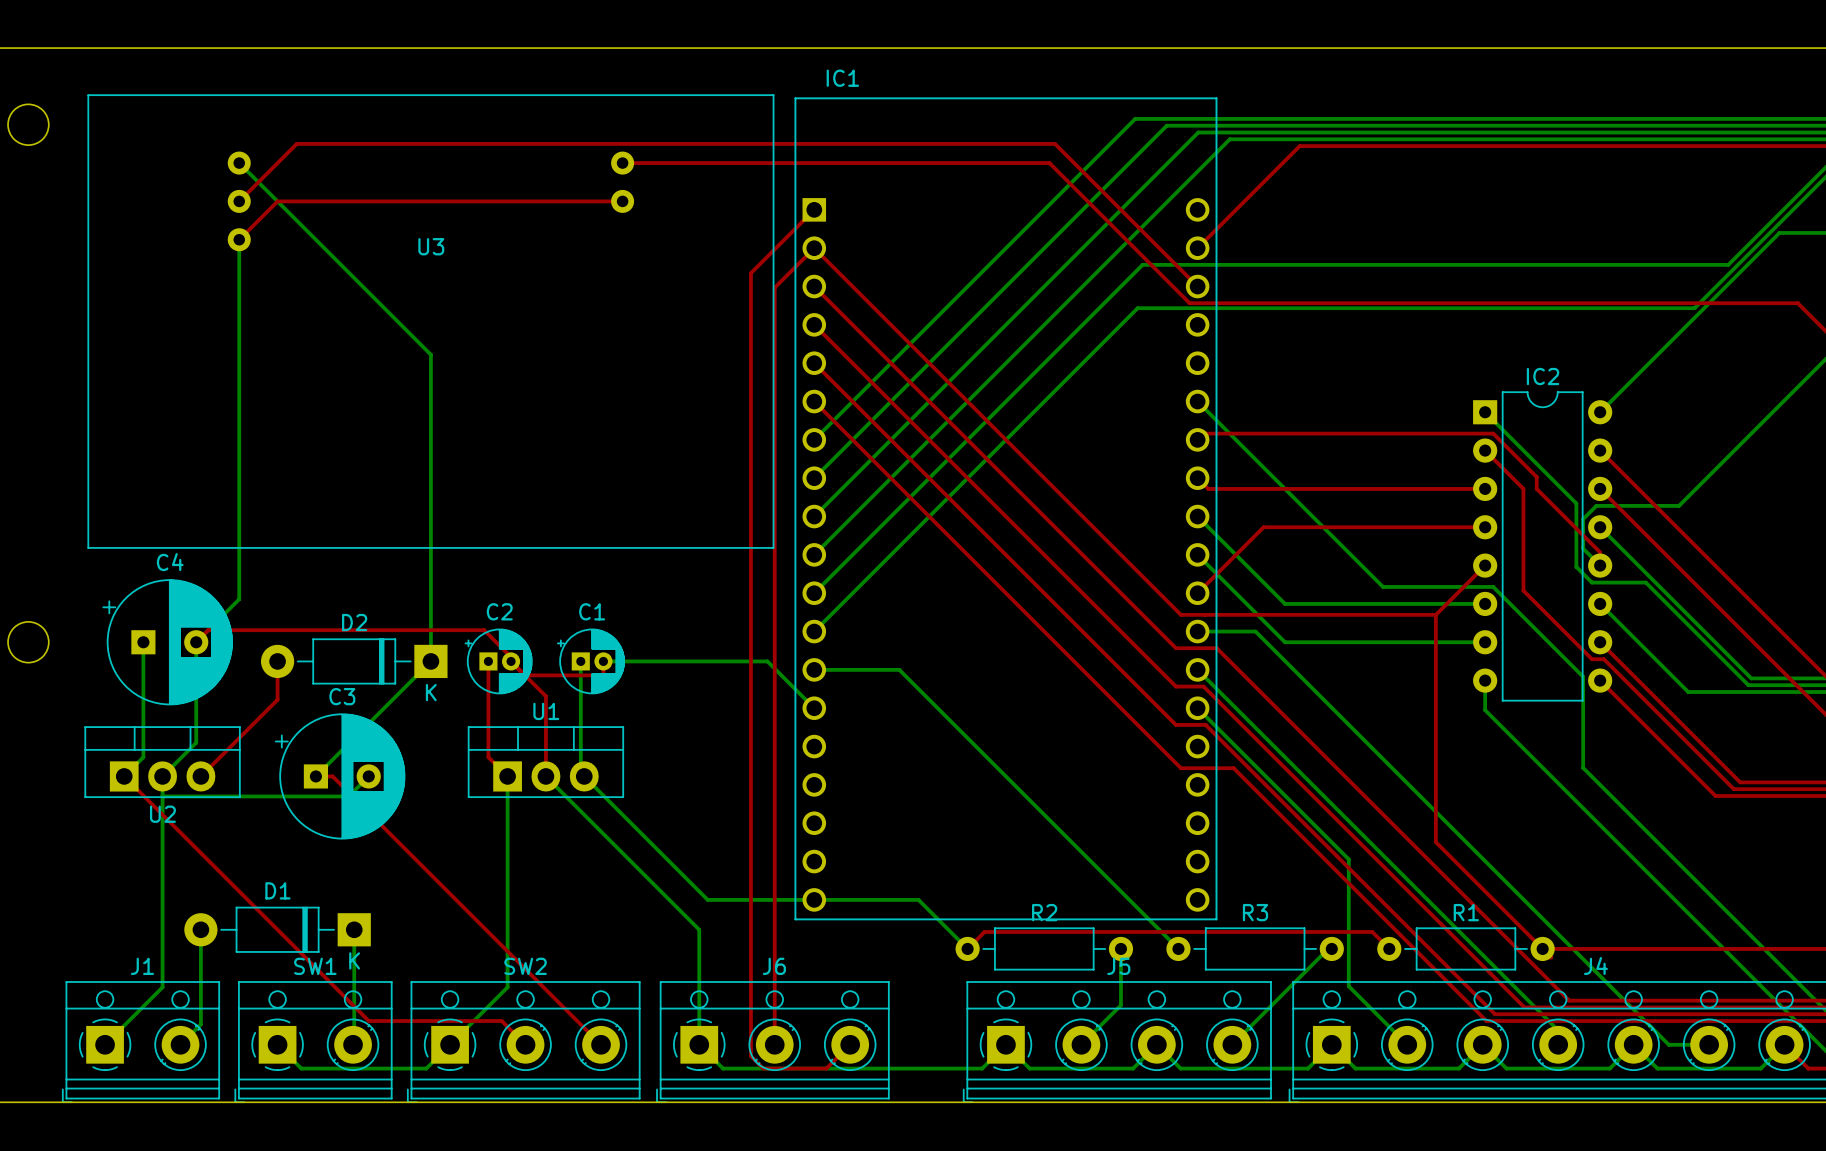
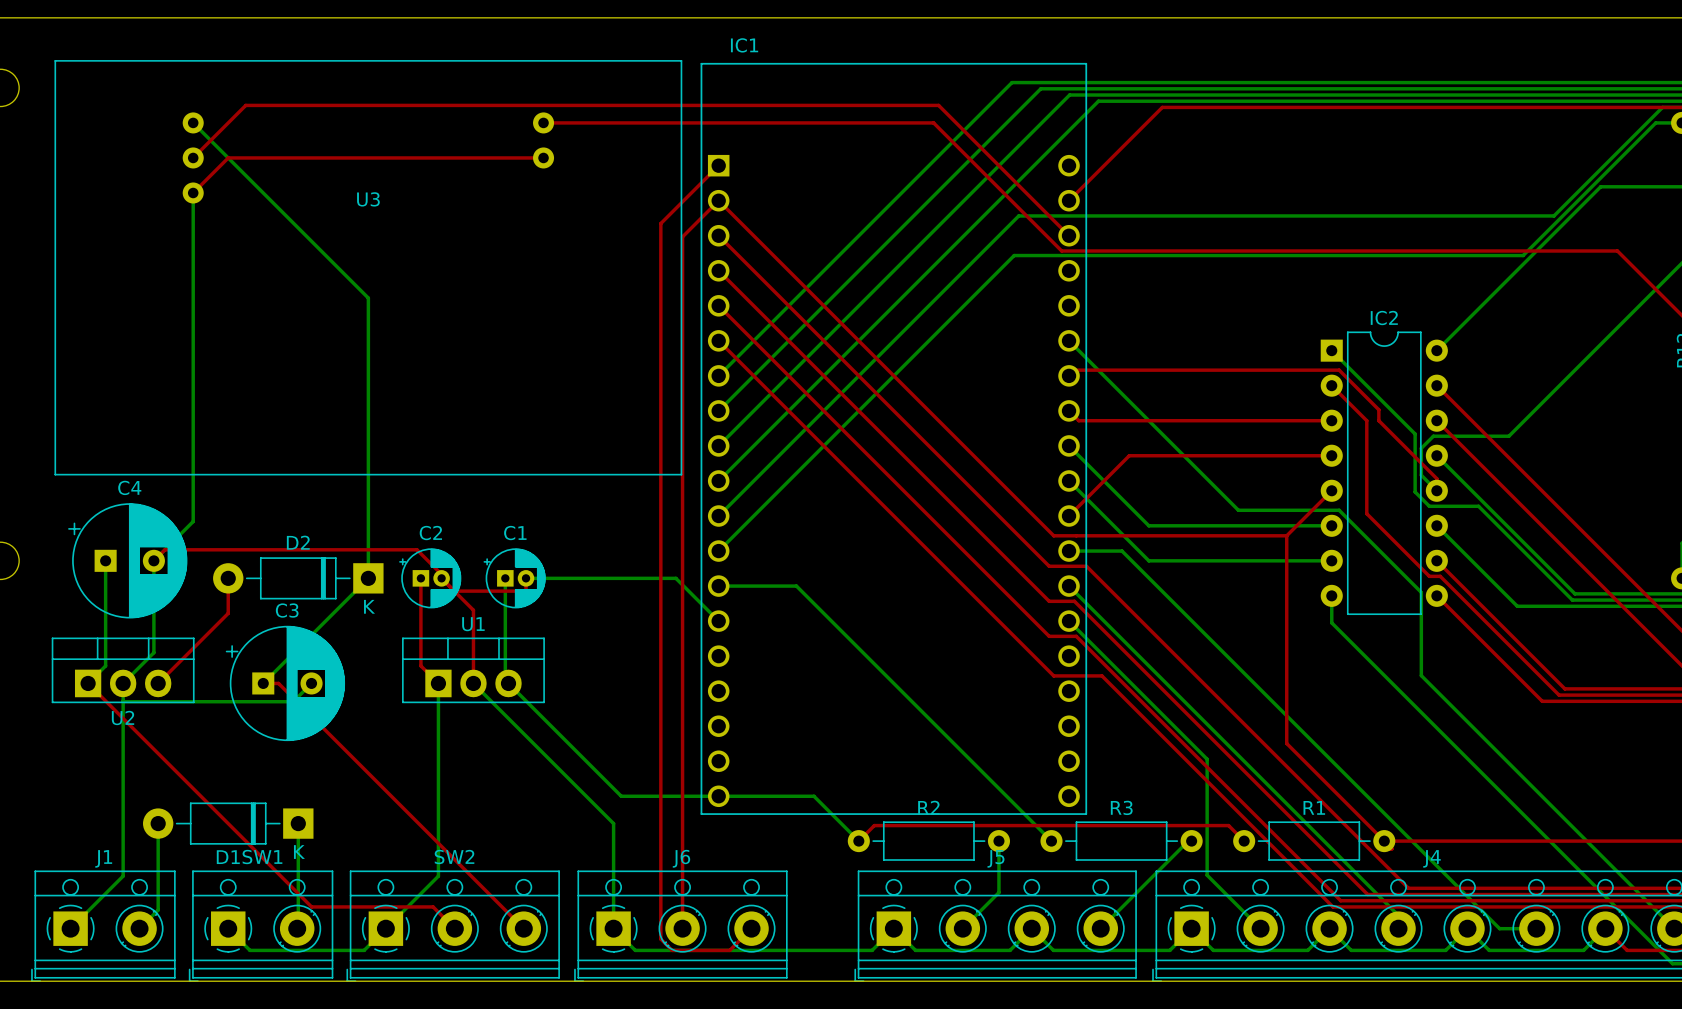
D1 name position: D1 (277, 890) -> D1 (228, 857)

